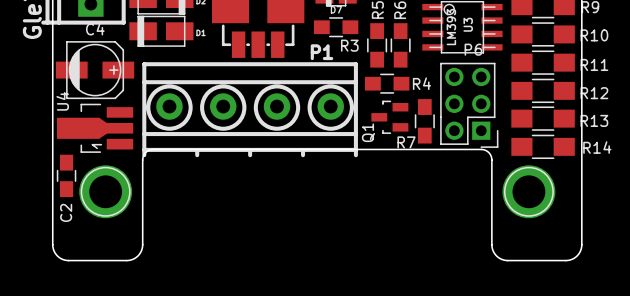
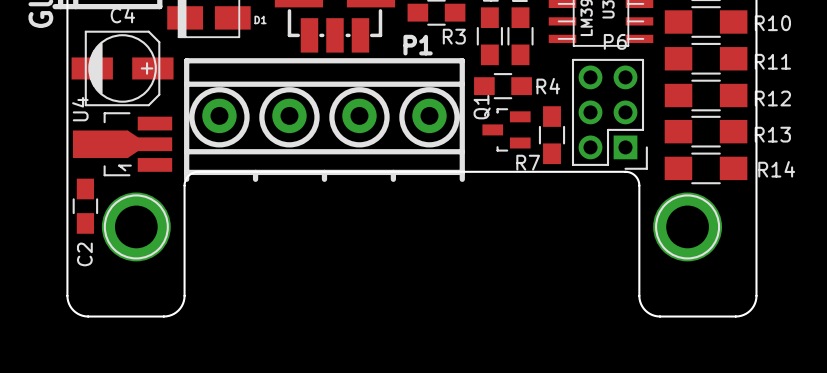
Q1 name position: Q1 (368, 132) -> Q1 (482, 107)

